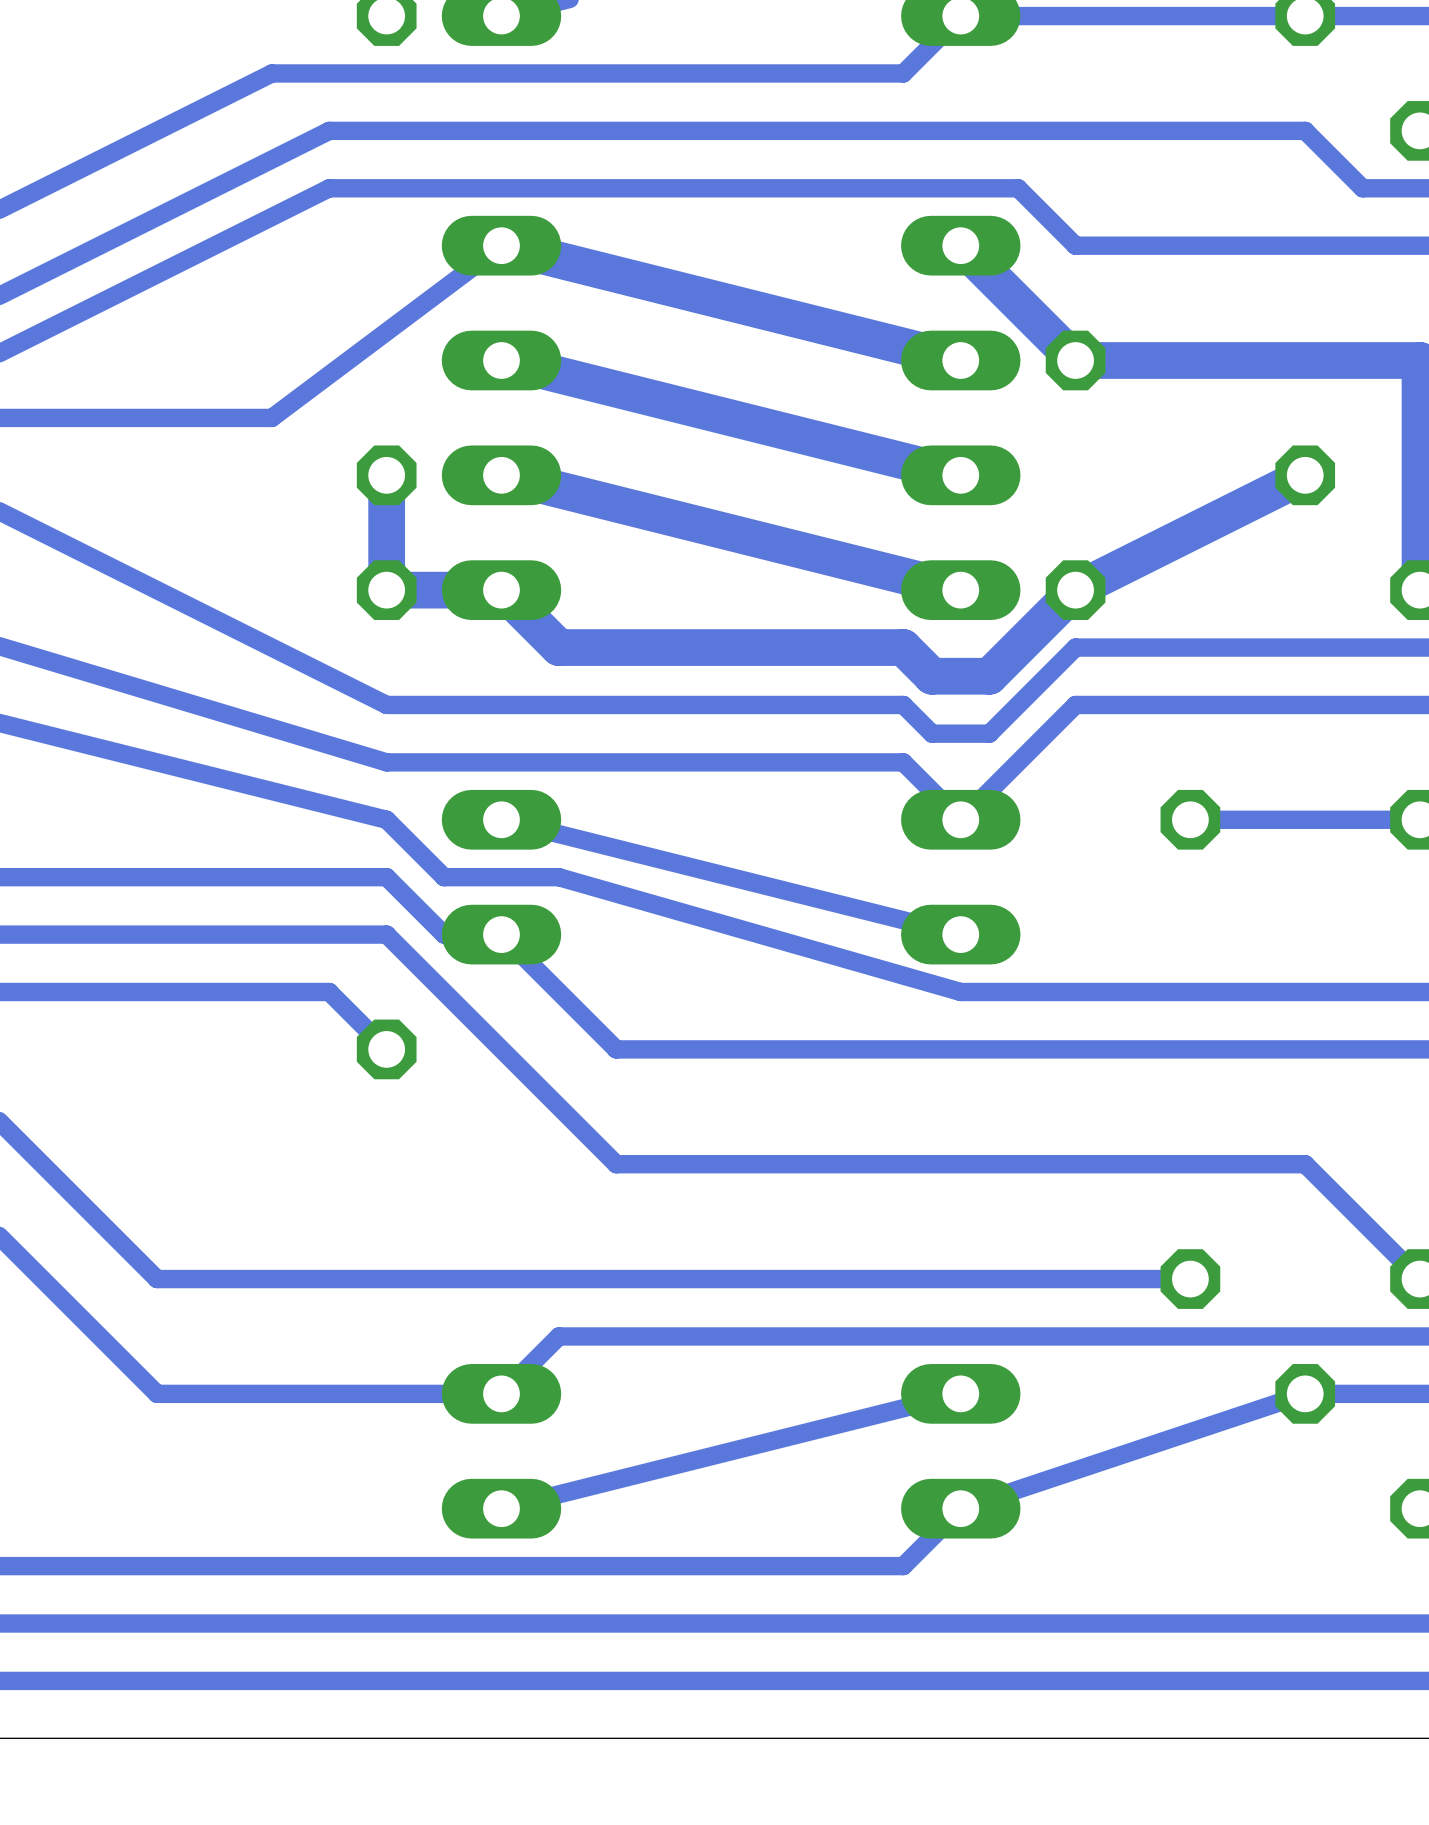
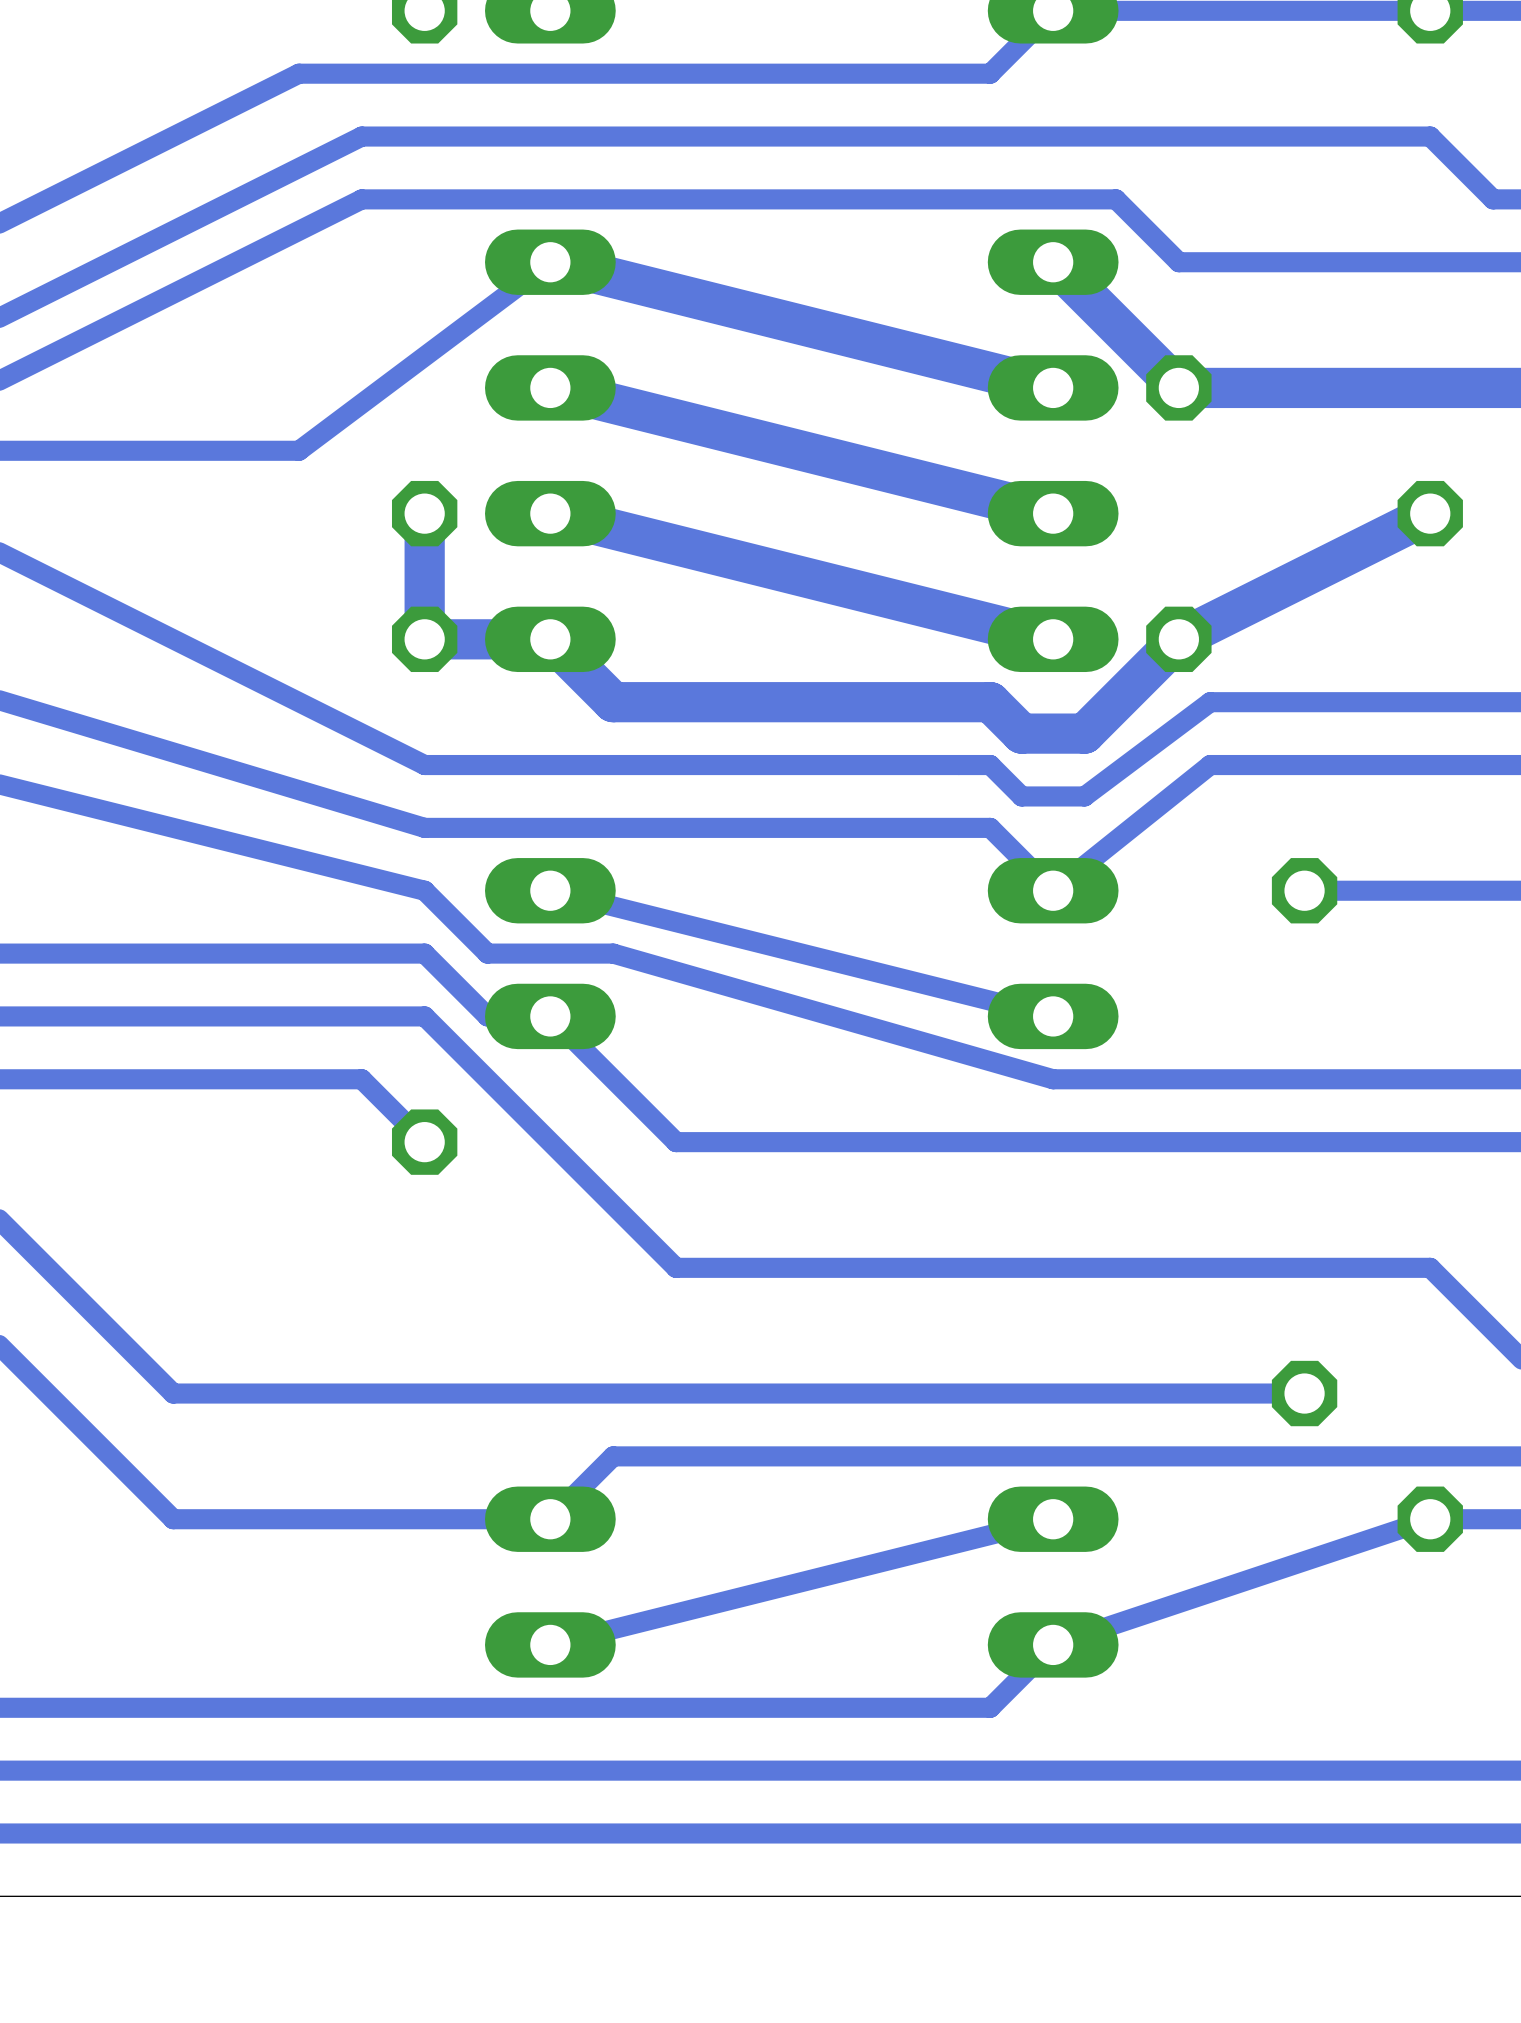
track: (1104, 647) (1075, 647) (989, 733) -> (1210, 702) (1084, 796)
track: (1104, 704) (1075, 704) (960, 819) -> (1210, 765) (1053, 890)

